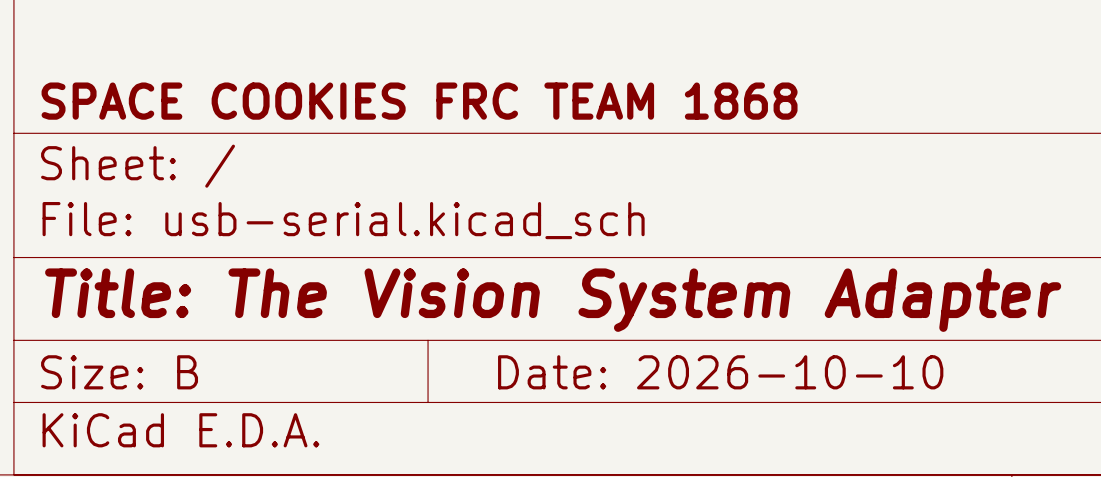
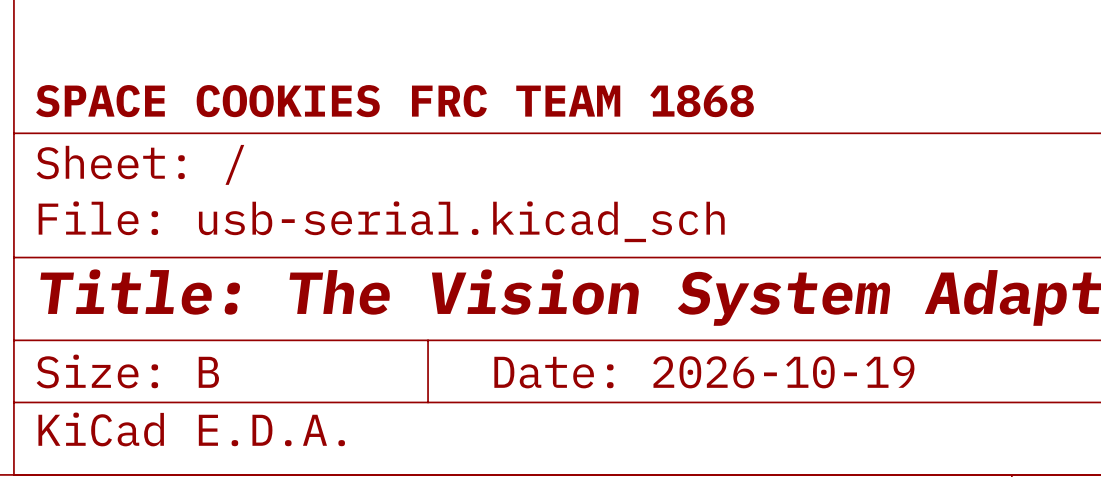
title block: Date: 2026-10-10 (720, 372) -> Date: 2026-10-19 (704, 372)

